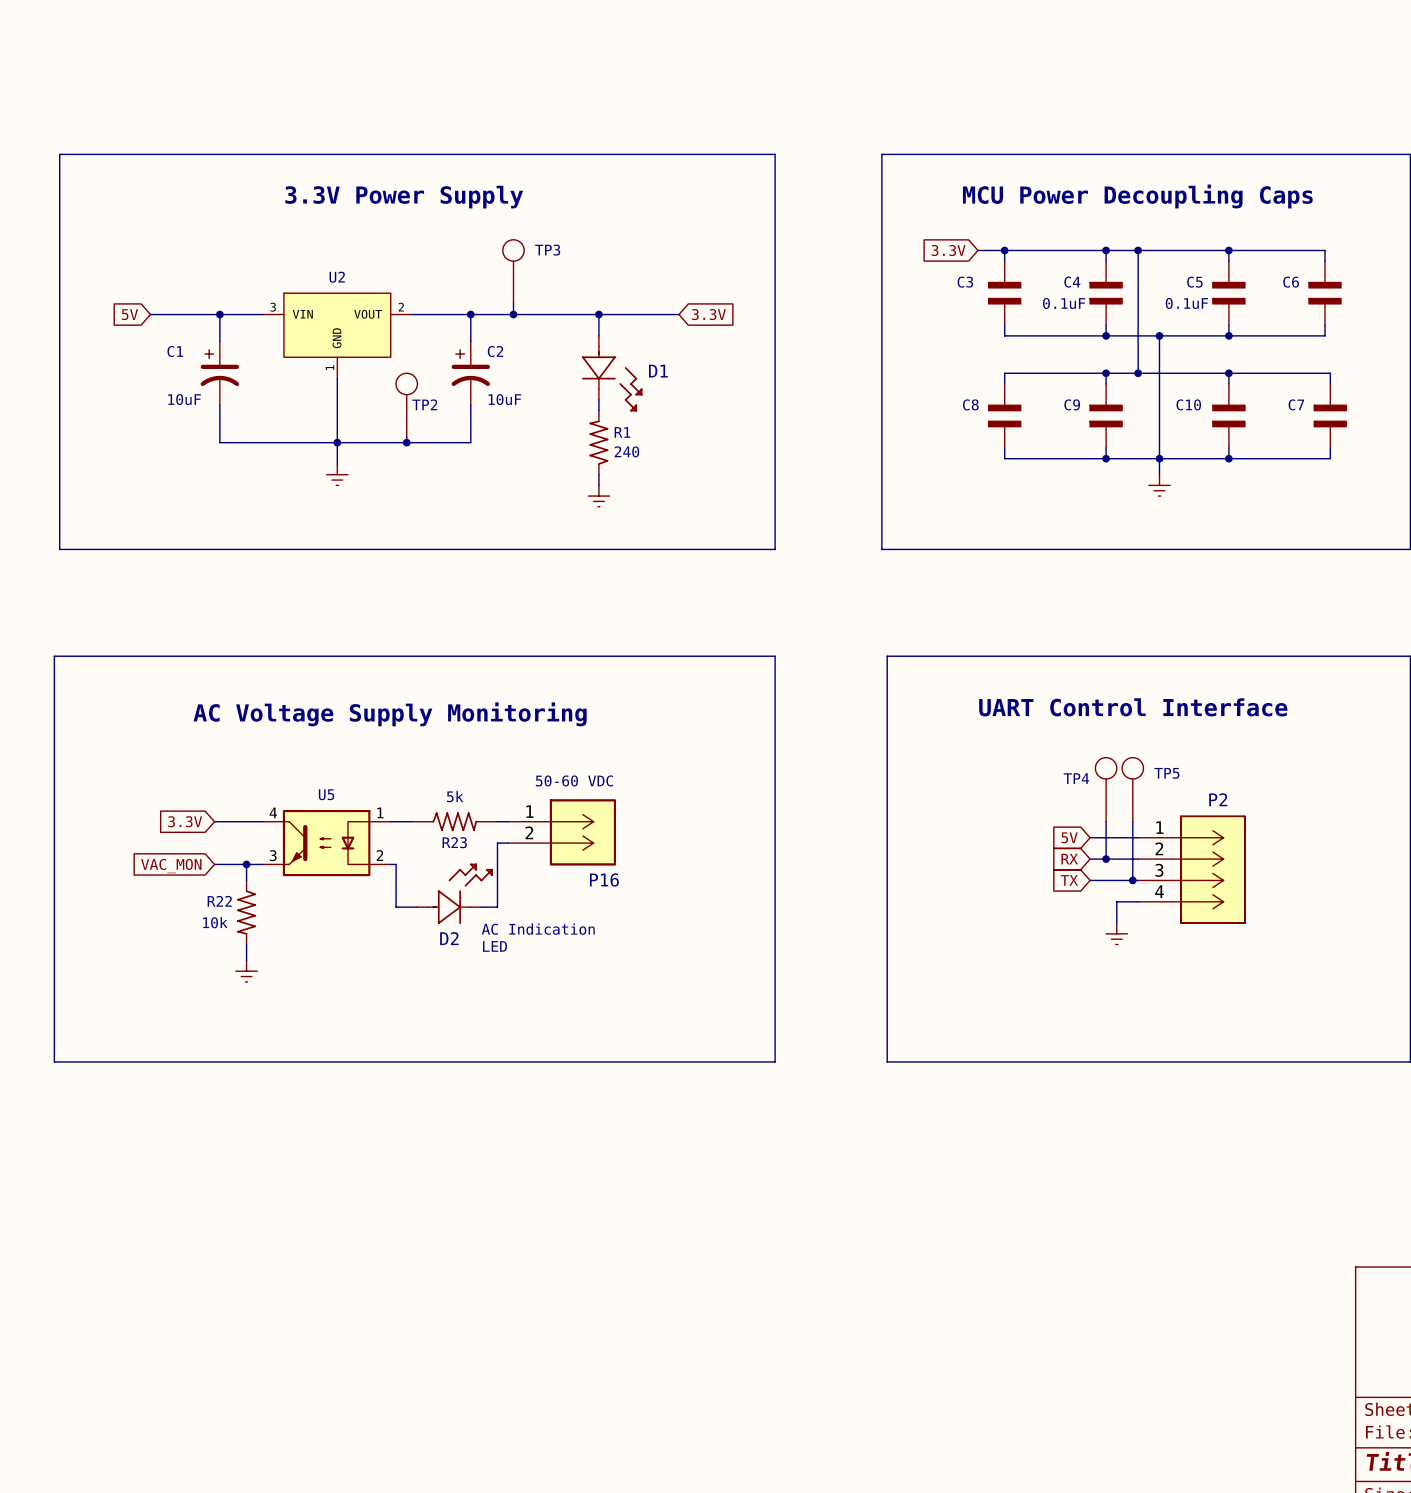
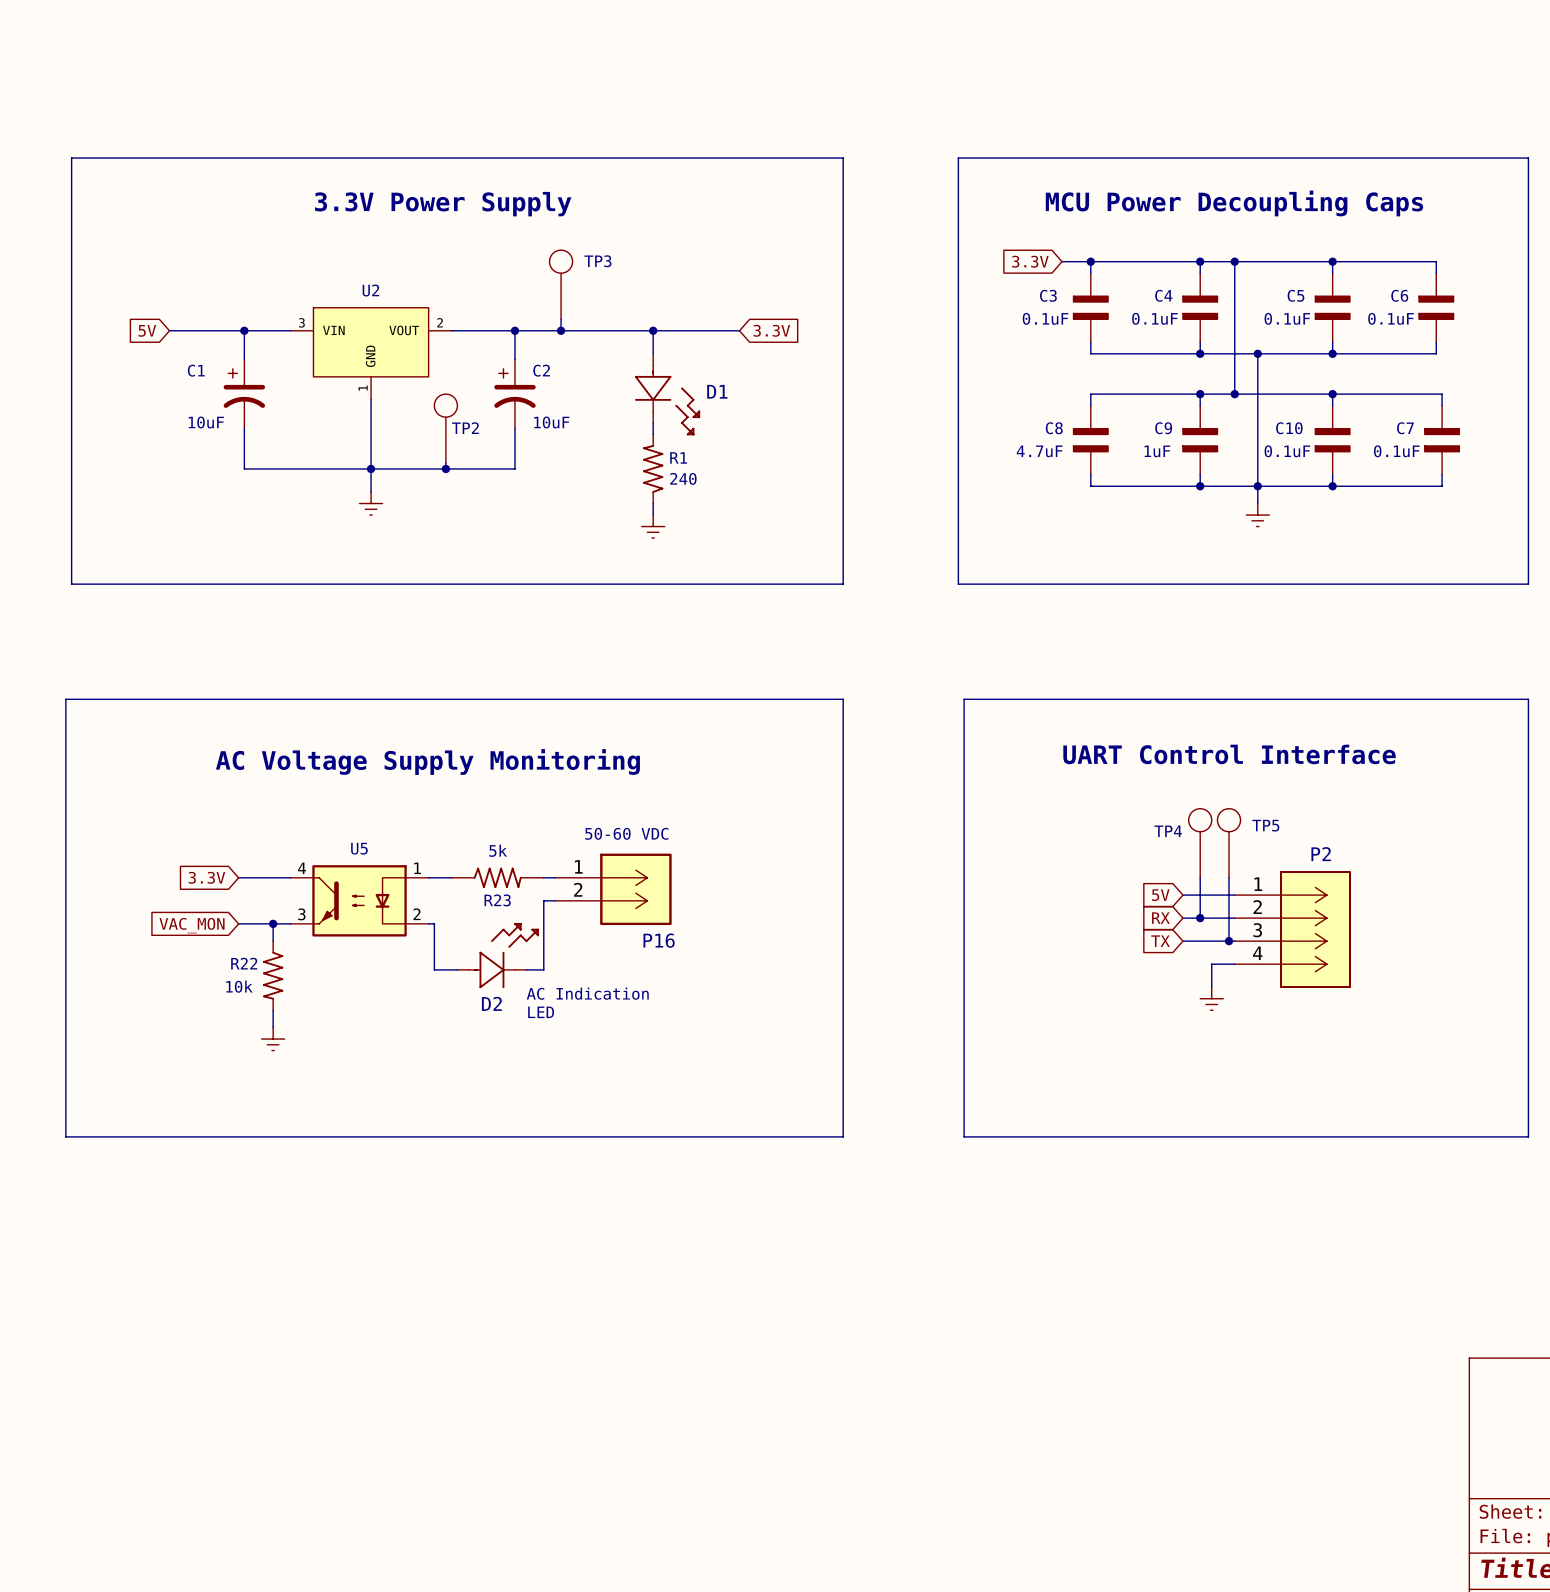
C3 value: none -> 0.1uF (1045, 318)
C6 value: none -> 0.1uF (1391, 318)
C8 value: none -> 4.7uF (1039, 451)
C9 value: none -> 1uF (1157, 451)
C10 value: none -> 0.1uF (1287, 451)
C7 value: none -> 0.1uF (1396, 451)

